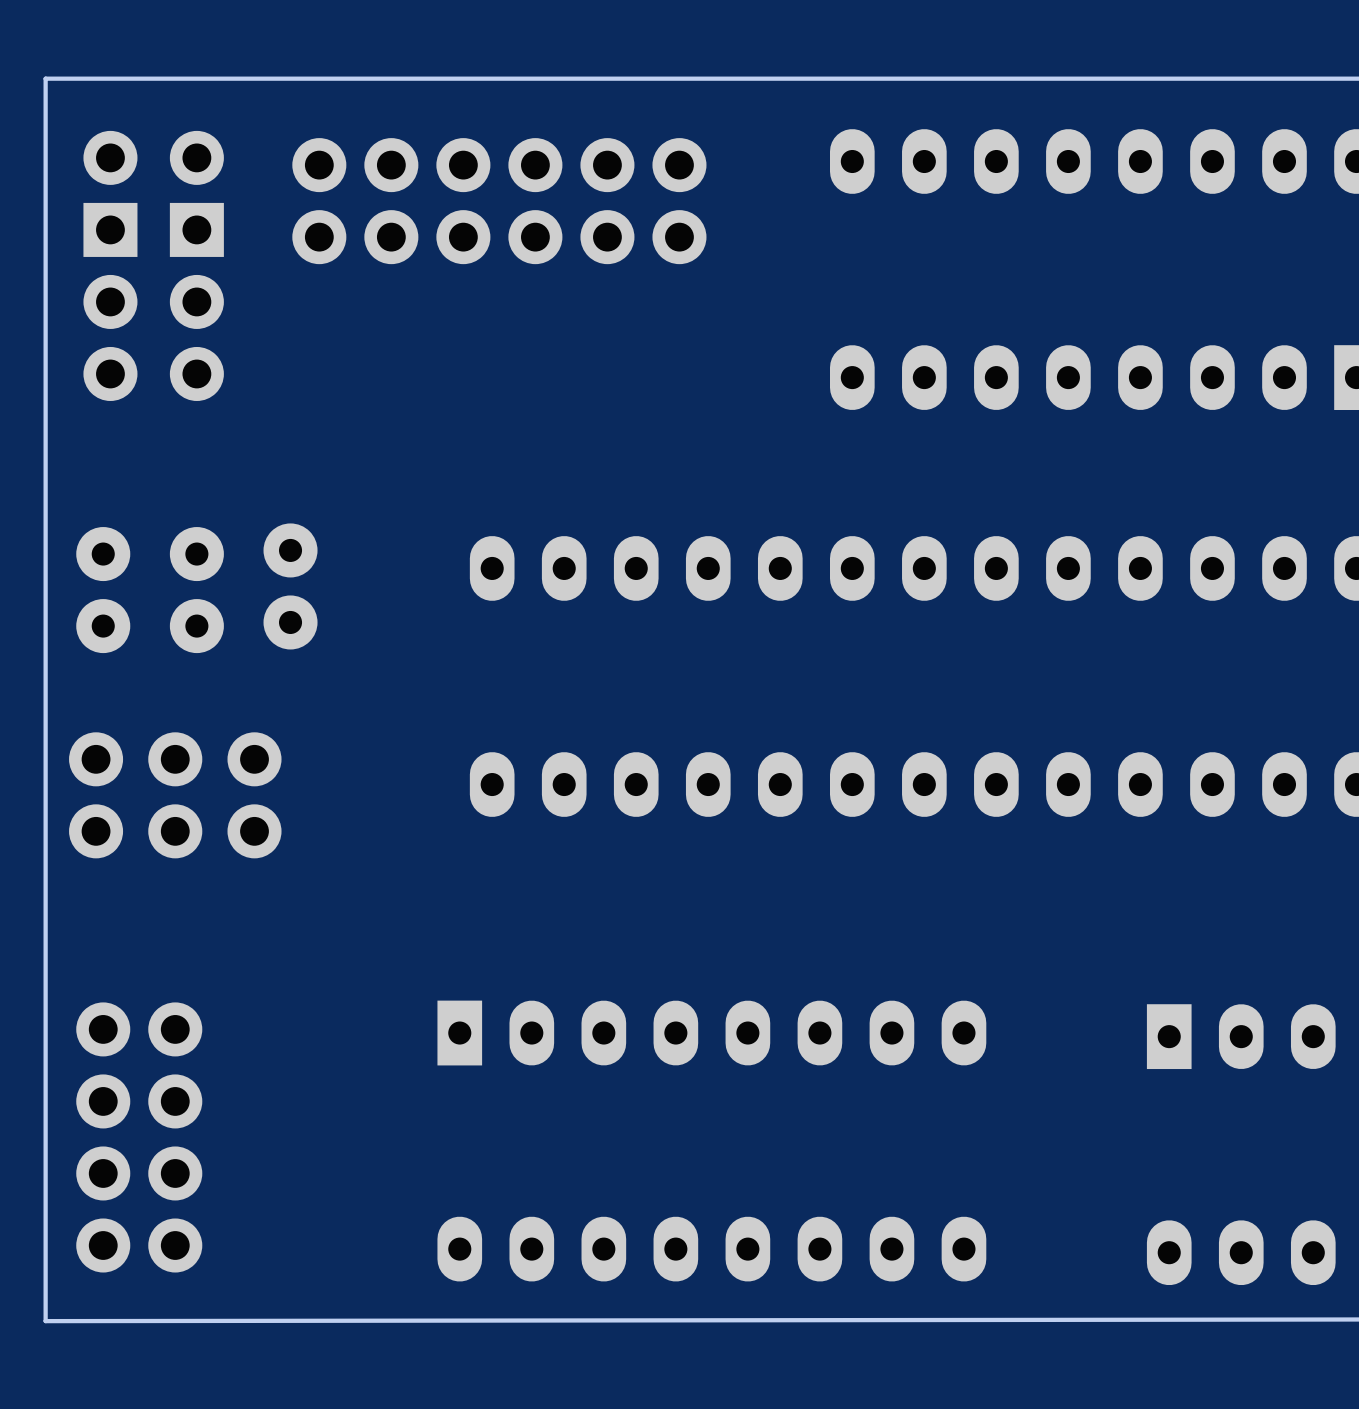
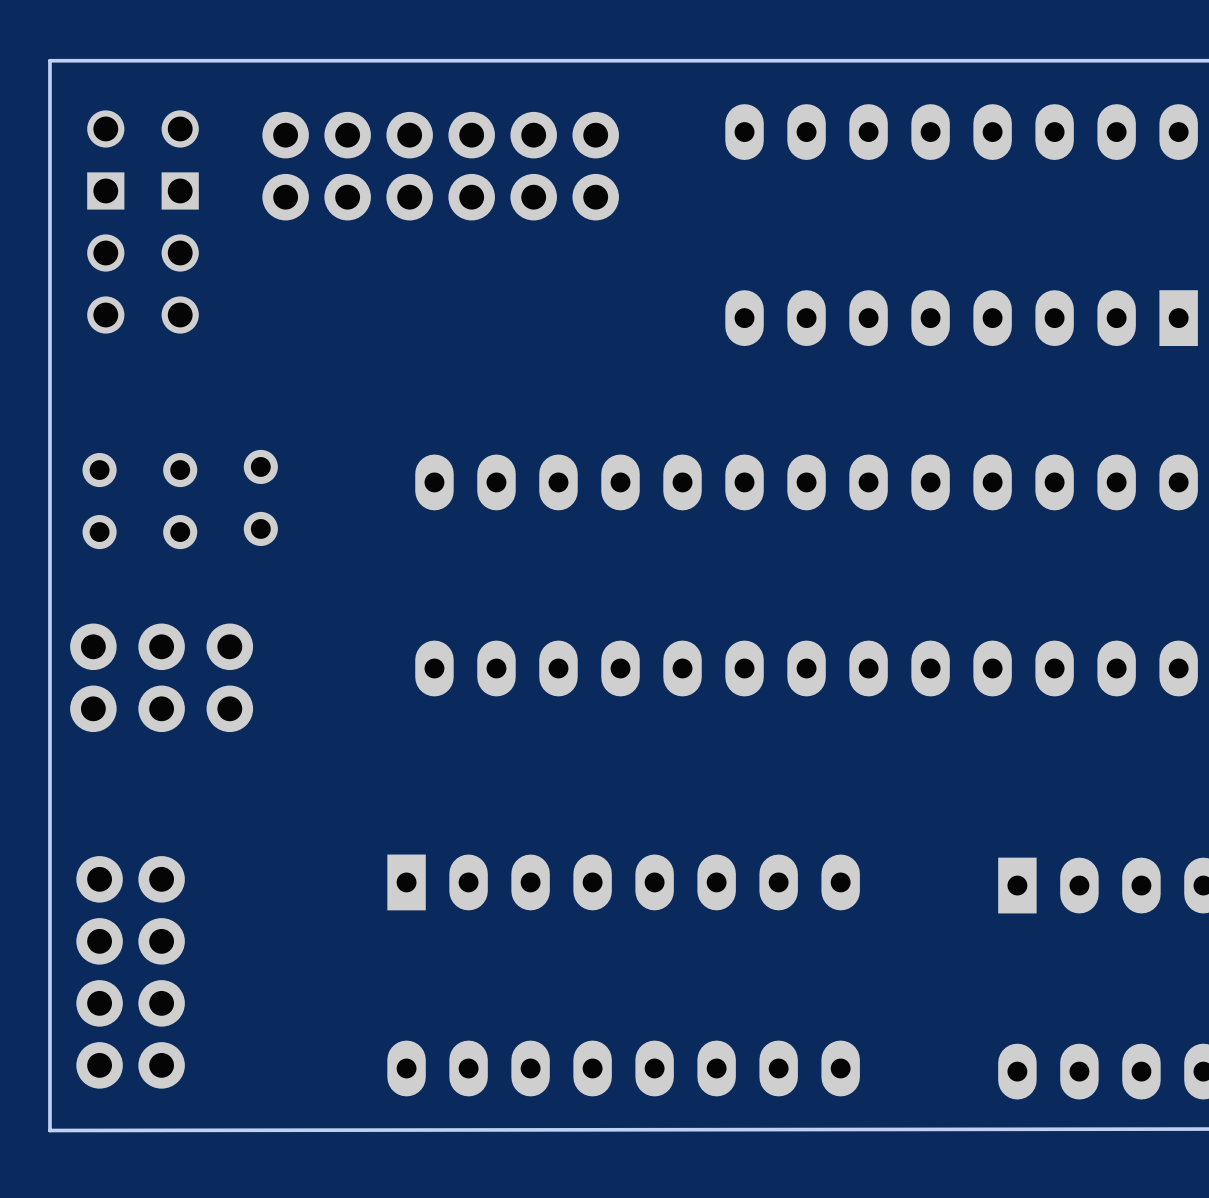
part footprint: [83, 130, 138, 401] -> [87, 110, 125, 334]
part footprint: [169, 130, 224, 401] -> [161, 110, 199, 334]
part footprint: [263, 523, 318, 650] -> [243, 449, 278, 547]
part footprint: [76, 527, 131, 654] -> [82, 452, 117, 550]
part footprint: [169, 527, 224, 654] -> [163, 452, 198, 550]

